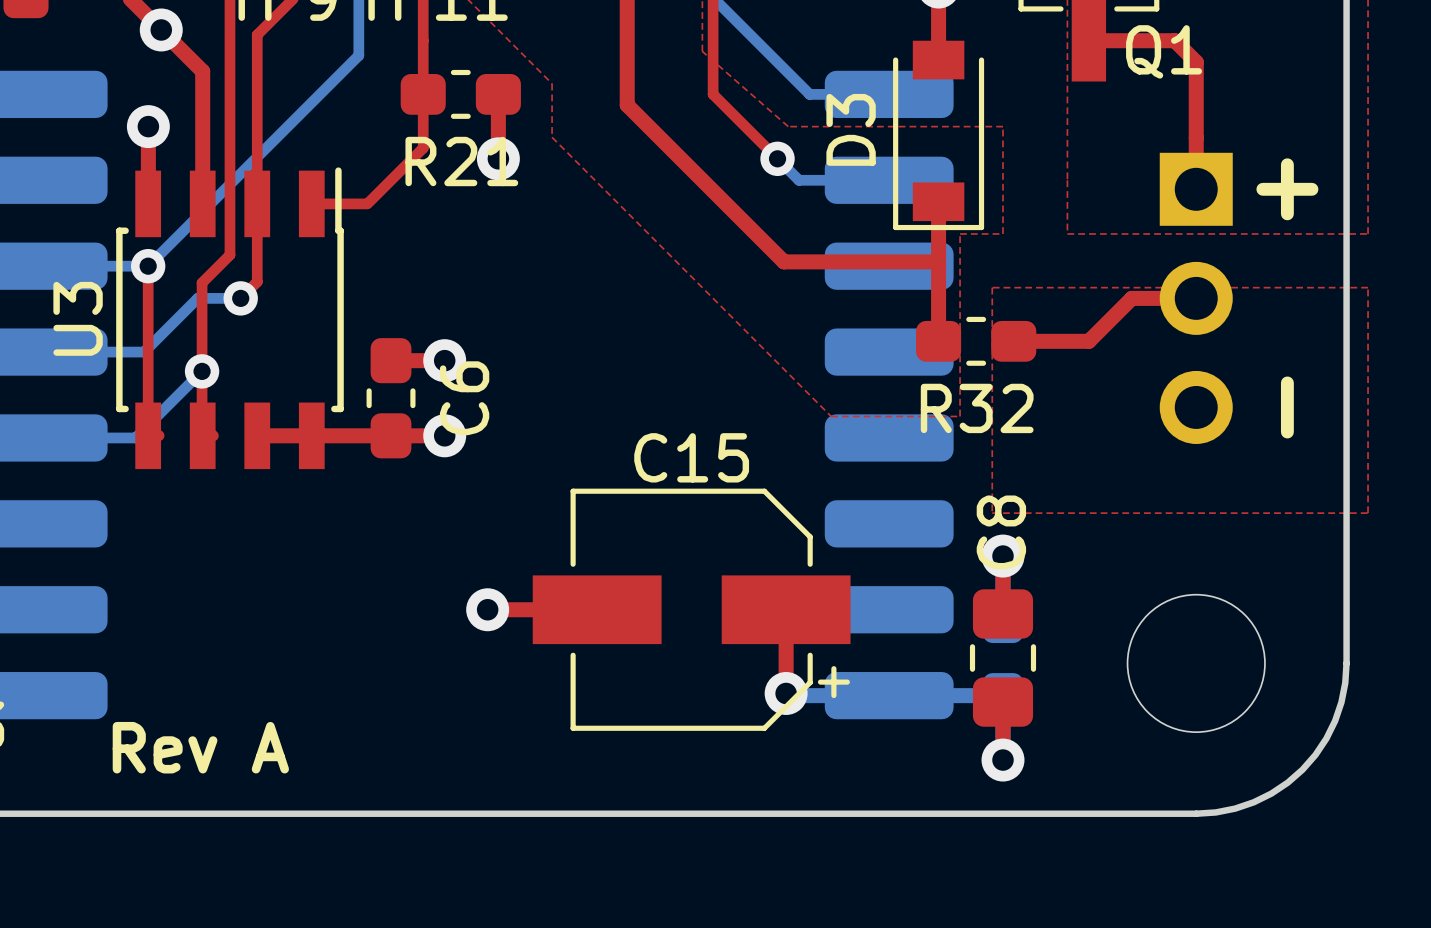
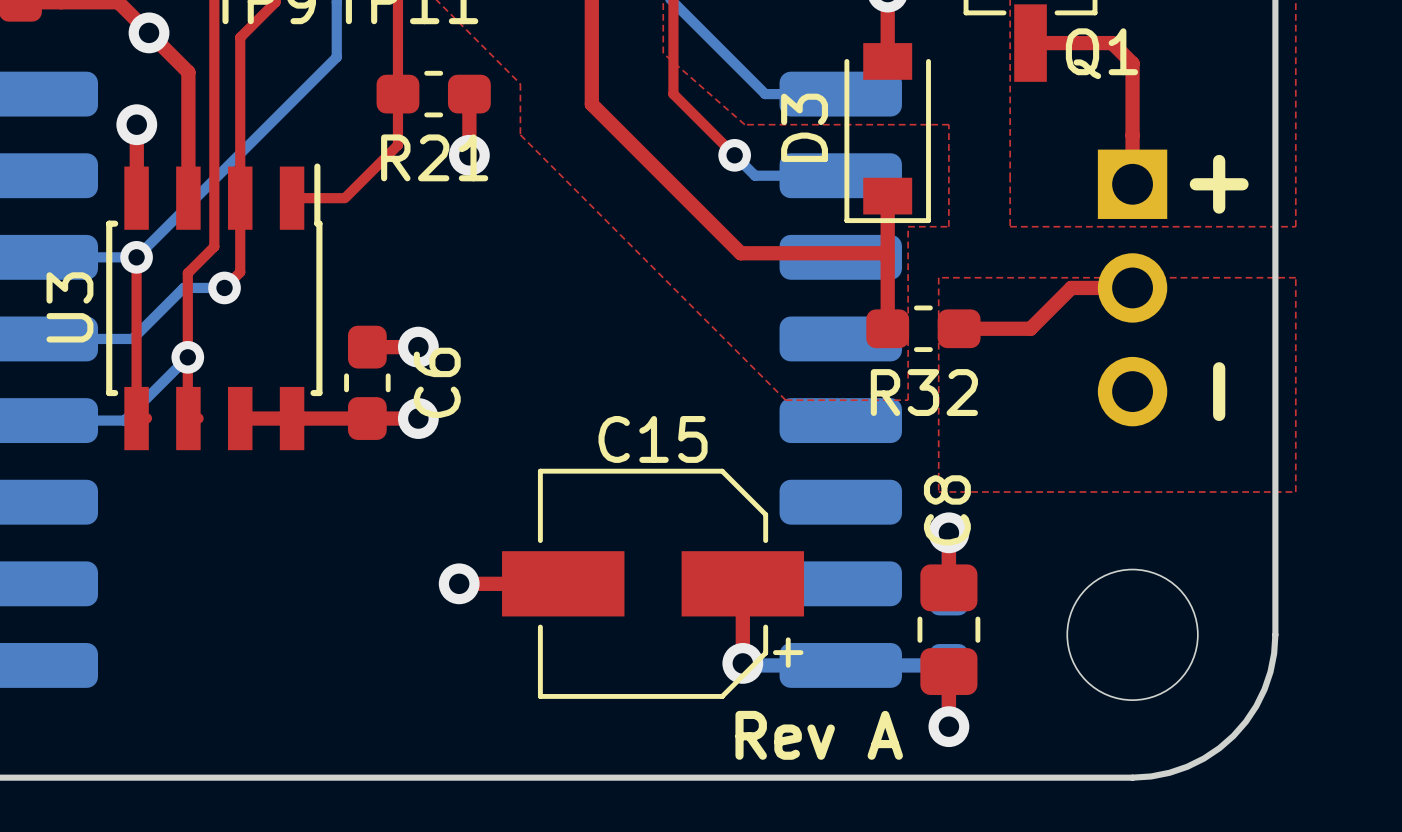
text position: Rev A (200, 747) -> Rev A (819, 735)

